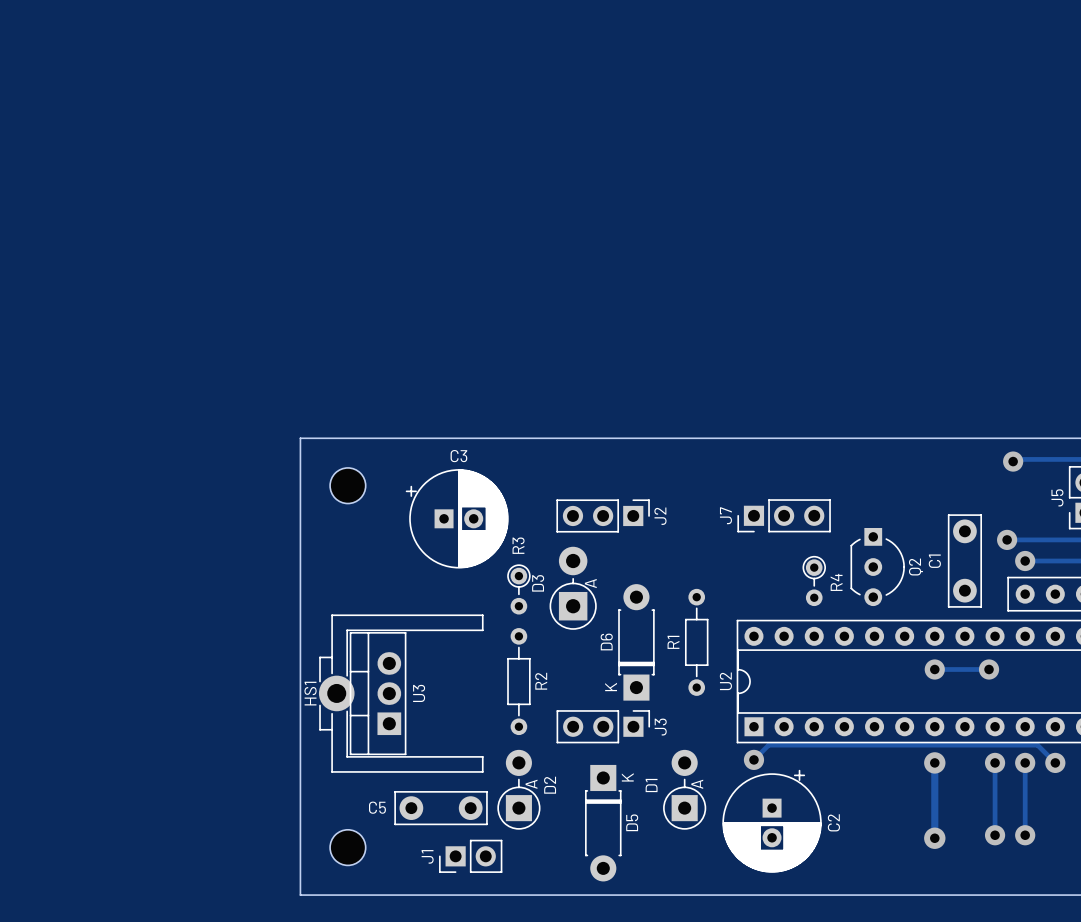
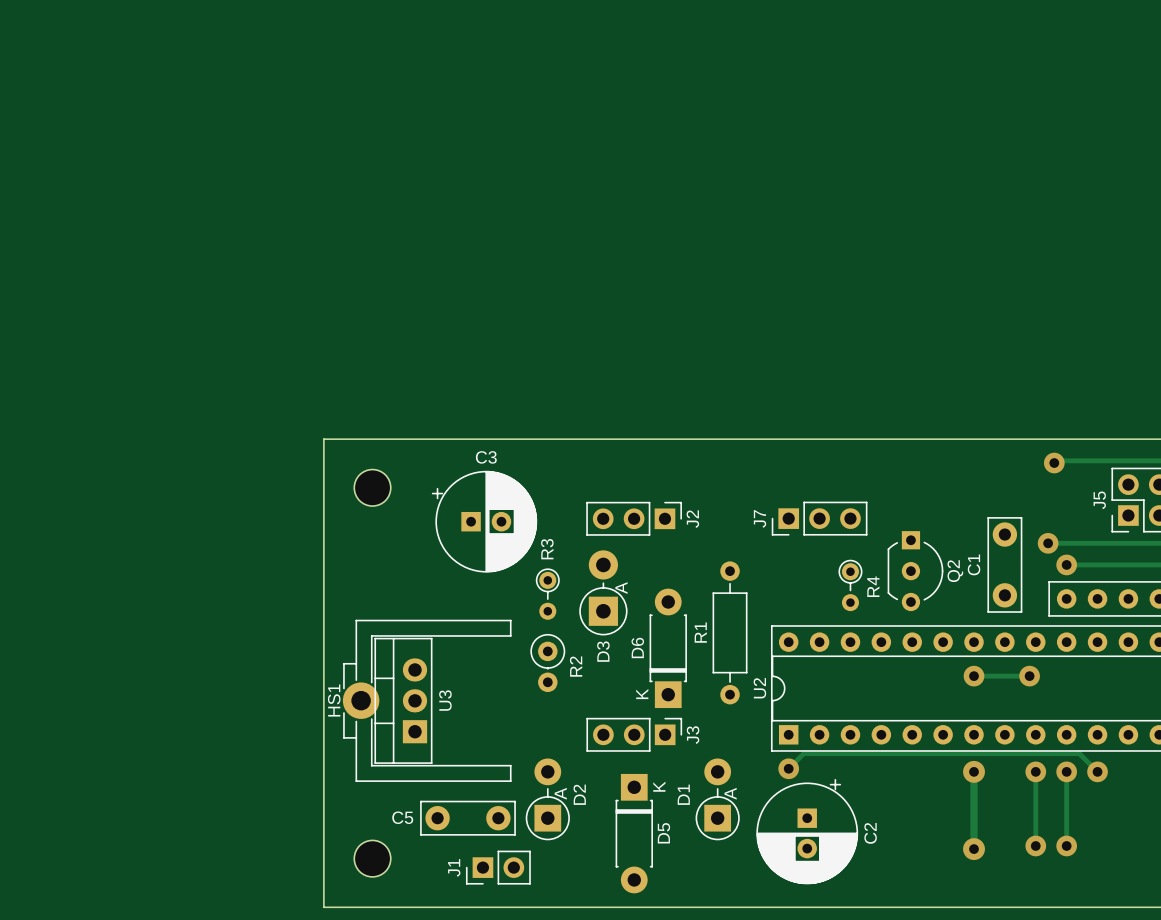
D3 name position: D3 (538, 583) -> D3 (603, 651)
R1 footprint: [685, 588, 709, 696] -> [712, 561, 748, 705]
R2 footprint: [507, 628, 531, 736] -> [530, 634, 566, 693]

